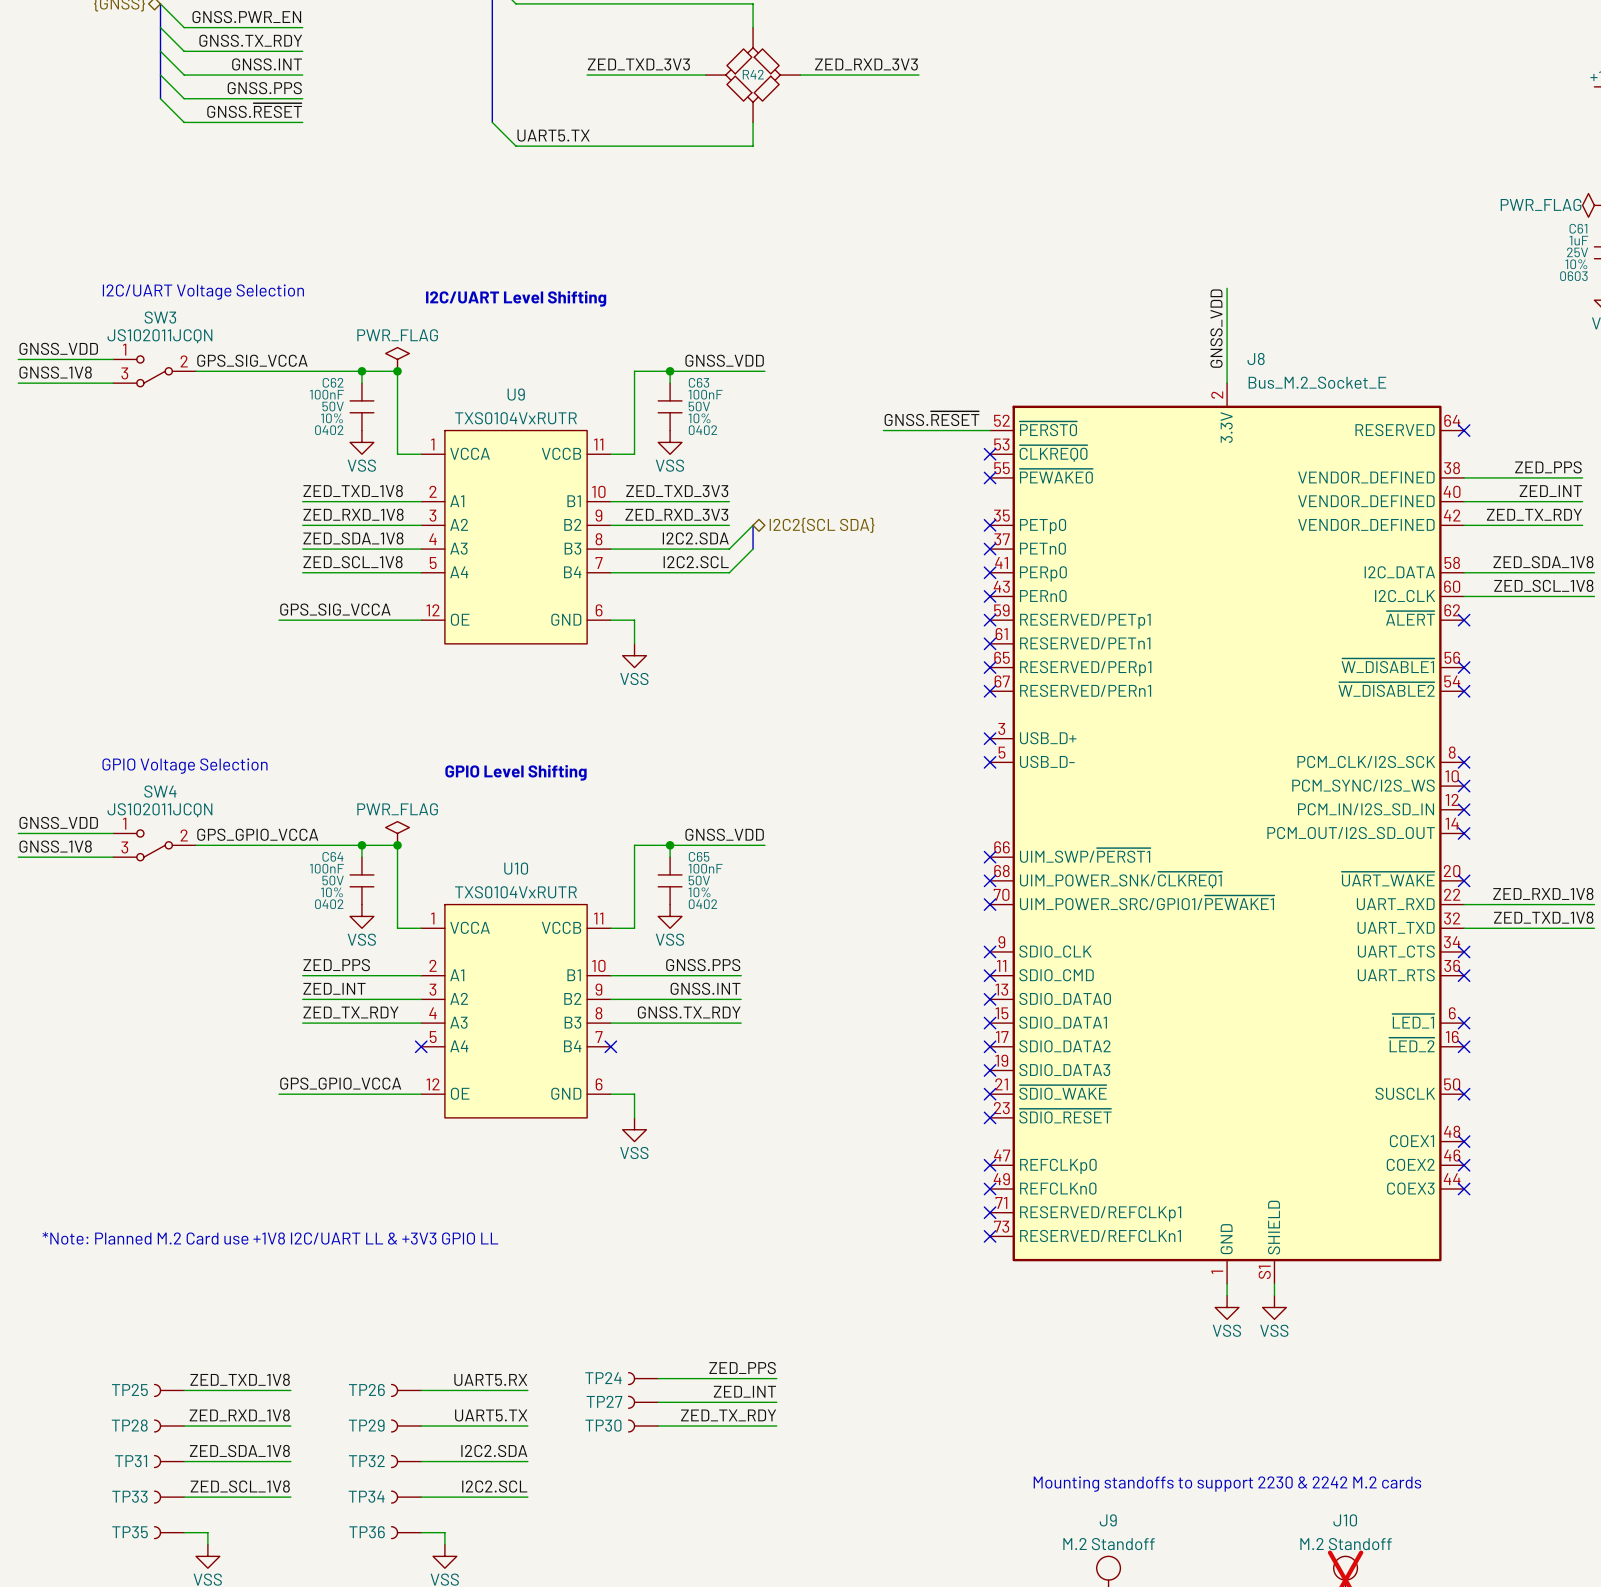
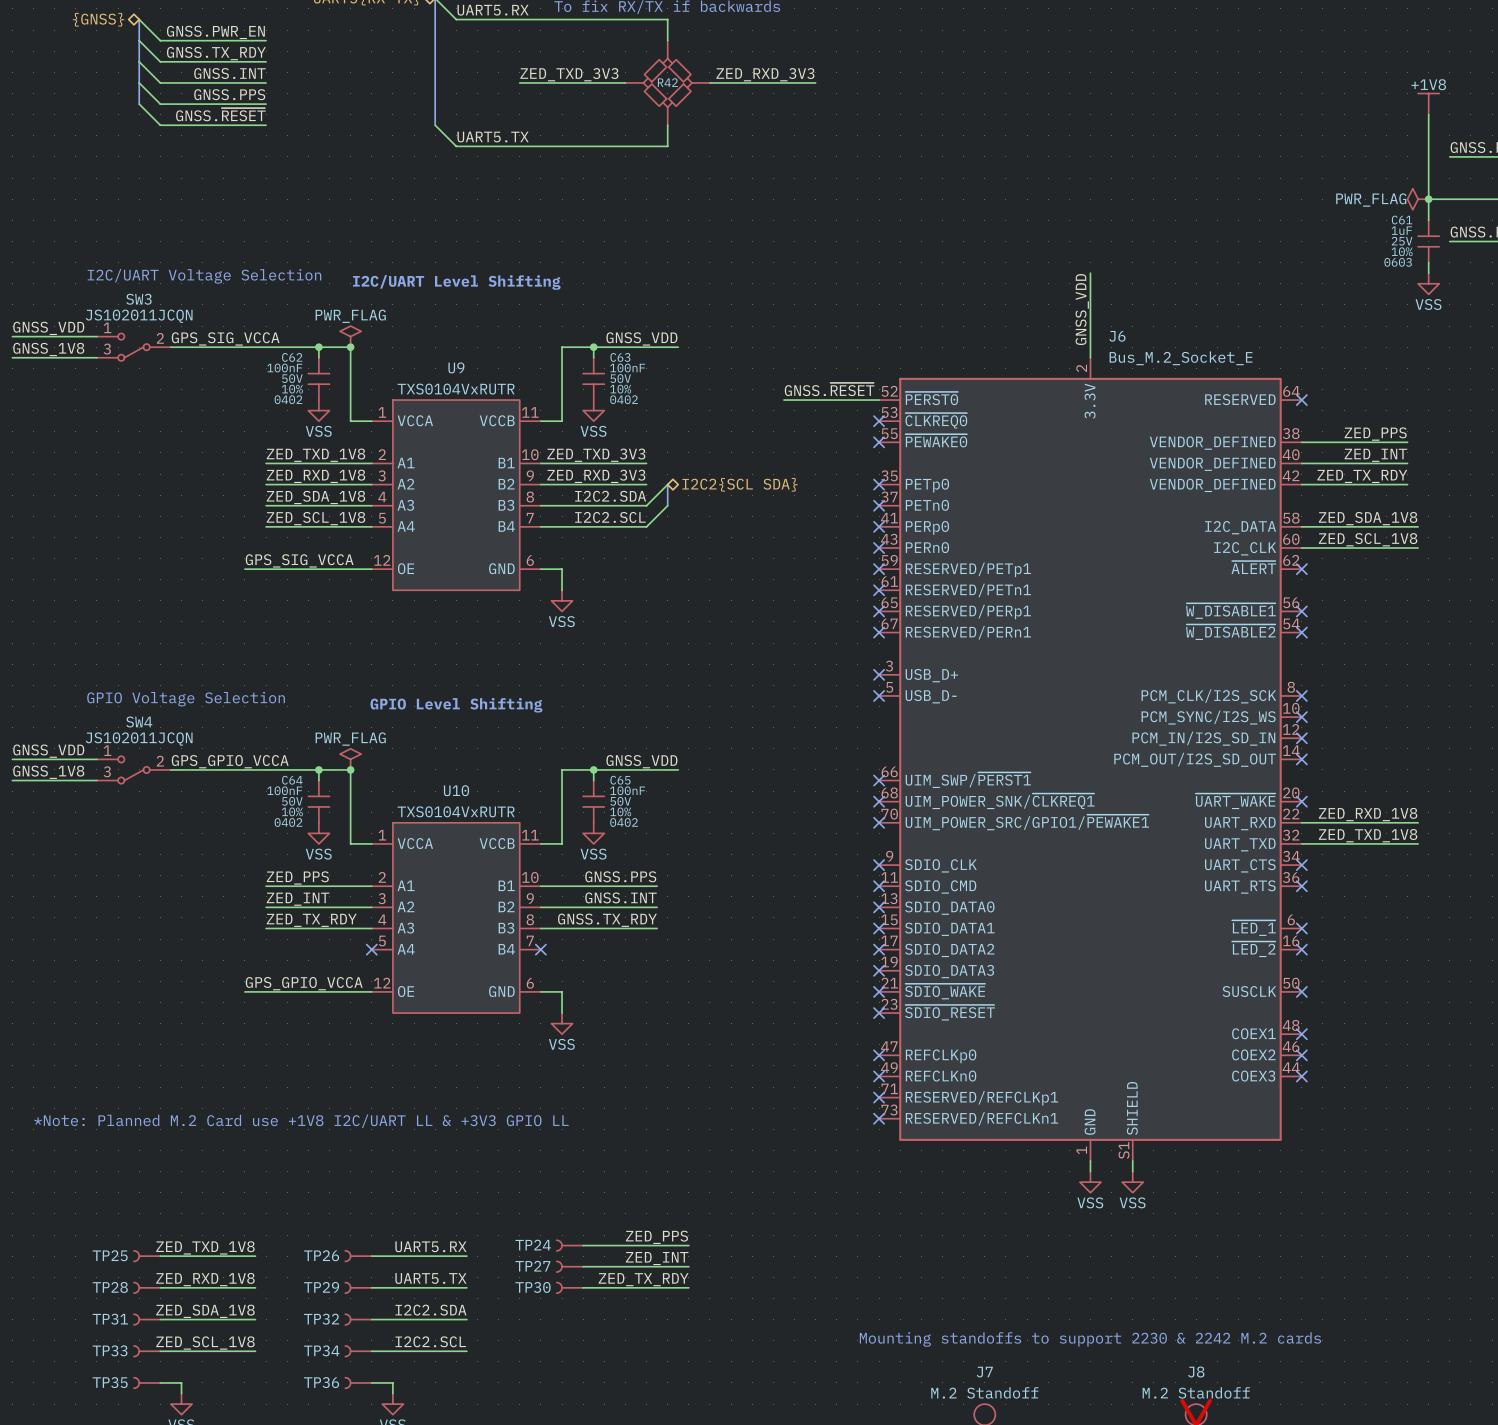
J8 name: J8 (1256, 358) -> J6 (1117, 336)
J9 name: J9 (1108, 1520) -> J7 (984, 1372)
J10 name: J10 (1345, 1520) -> J8 (1196, 1372)

